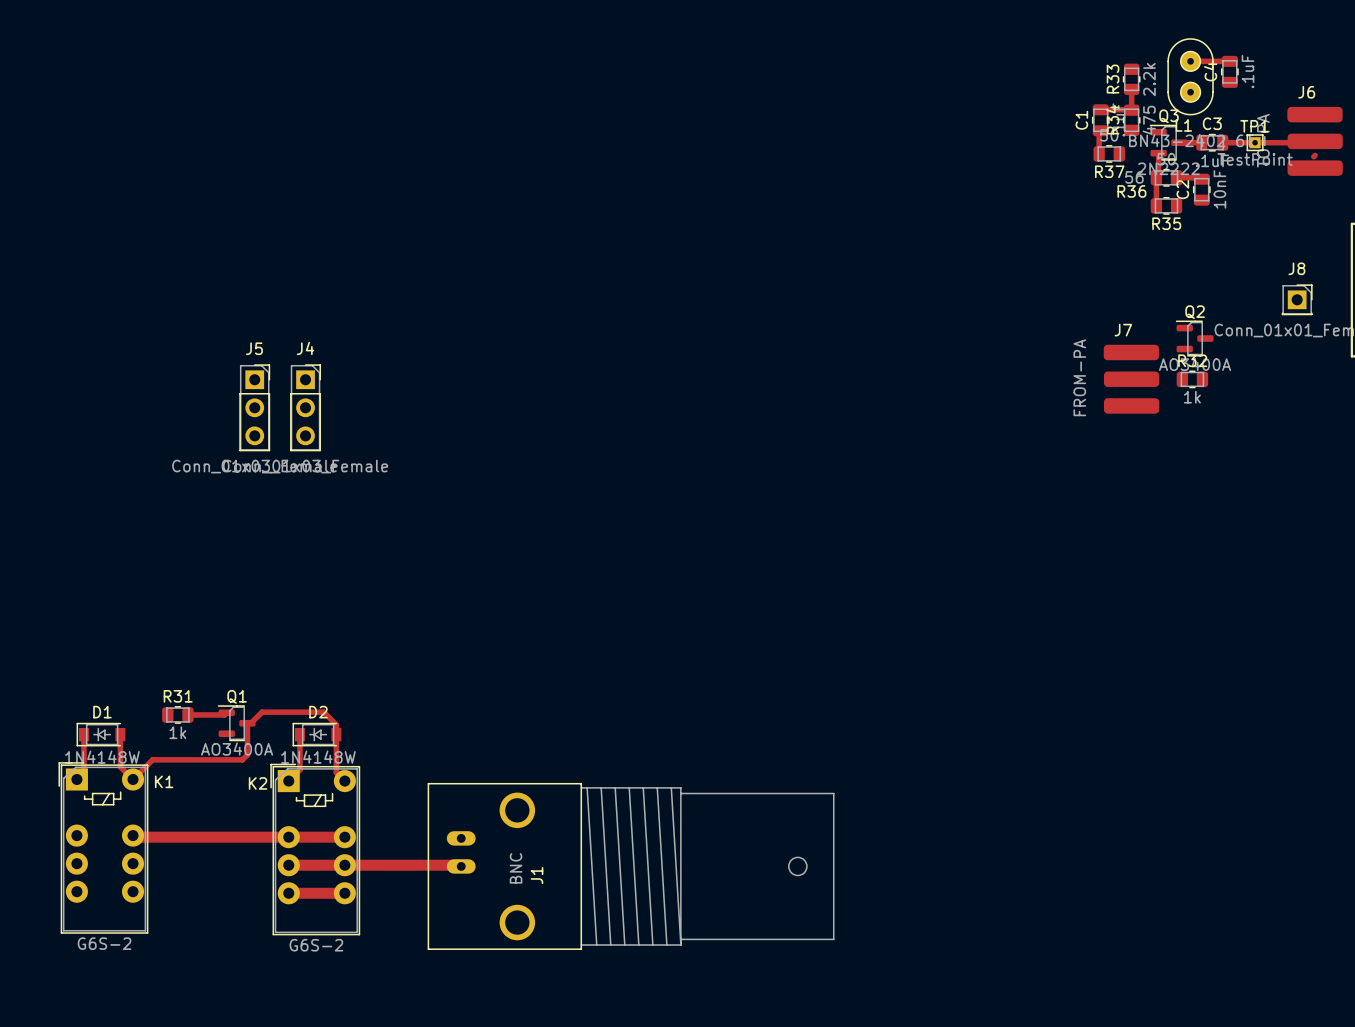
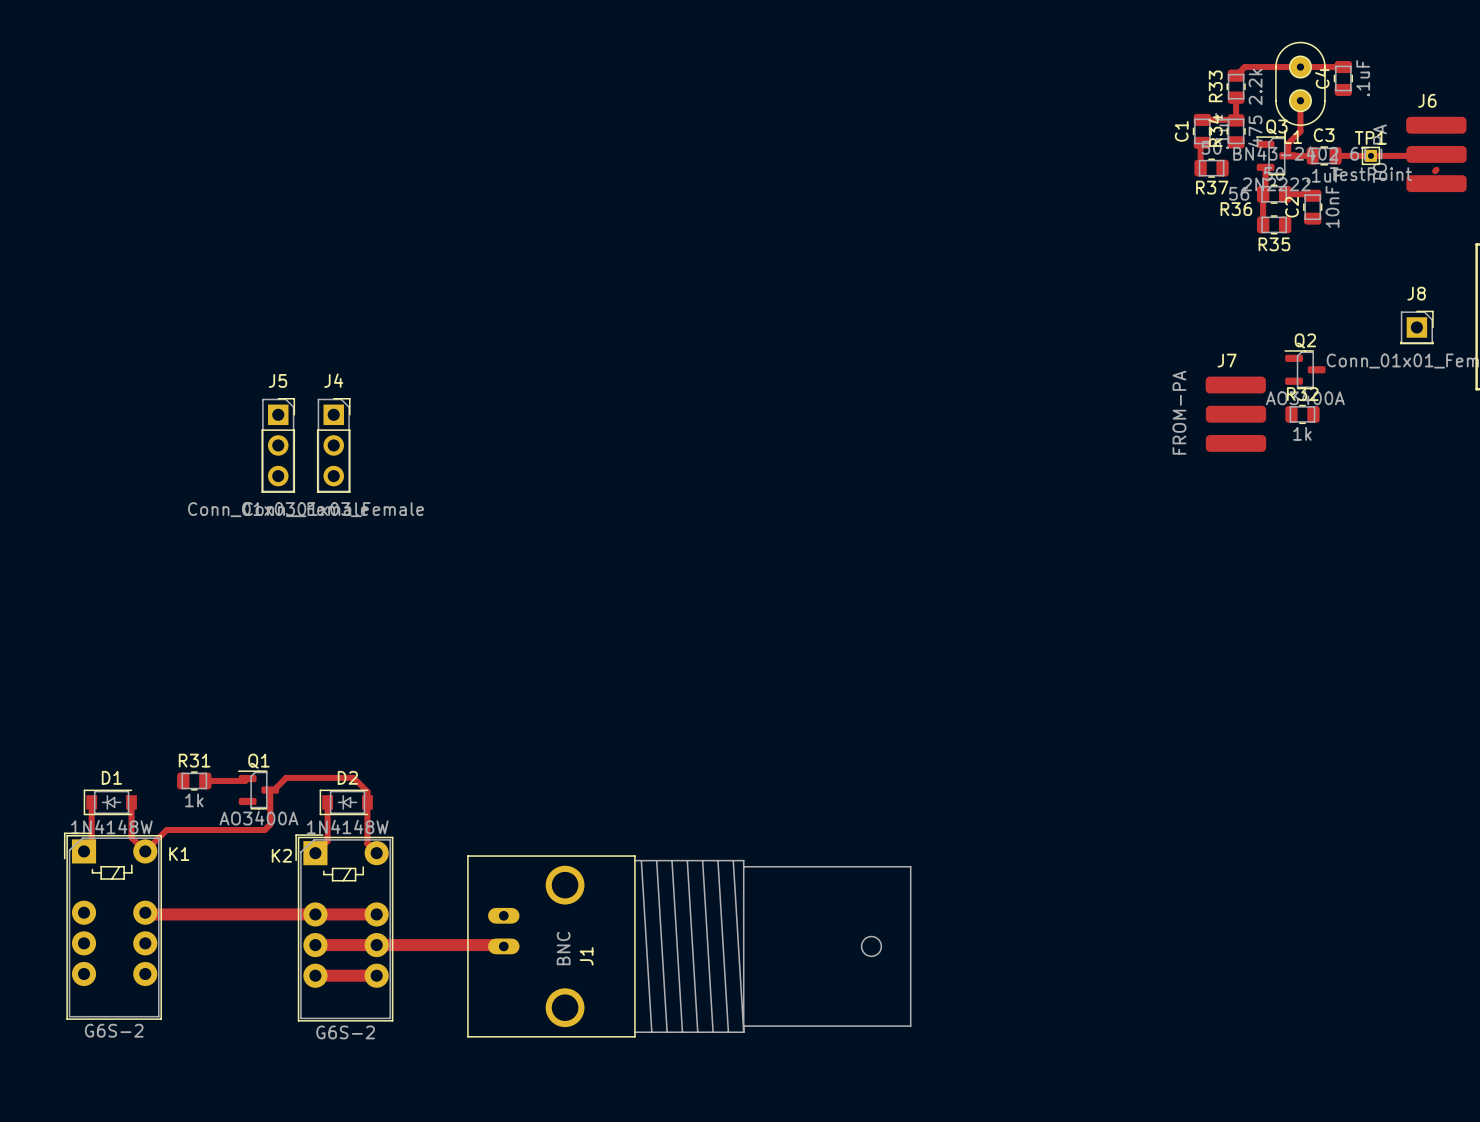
track: none -> (1300, 67) (1244, 67) (1236, 75)
track: none -> (1300, 100) (1300, 131) (1288, 143) (1288, 155)

